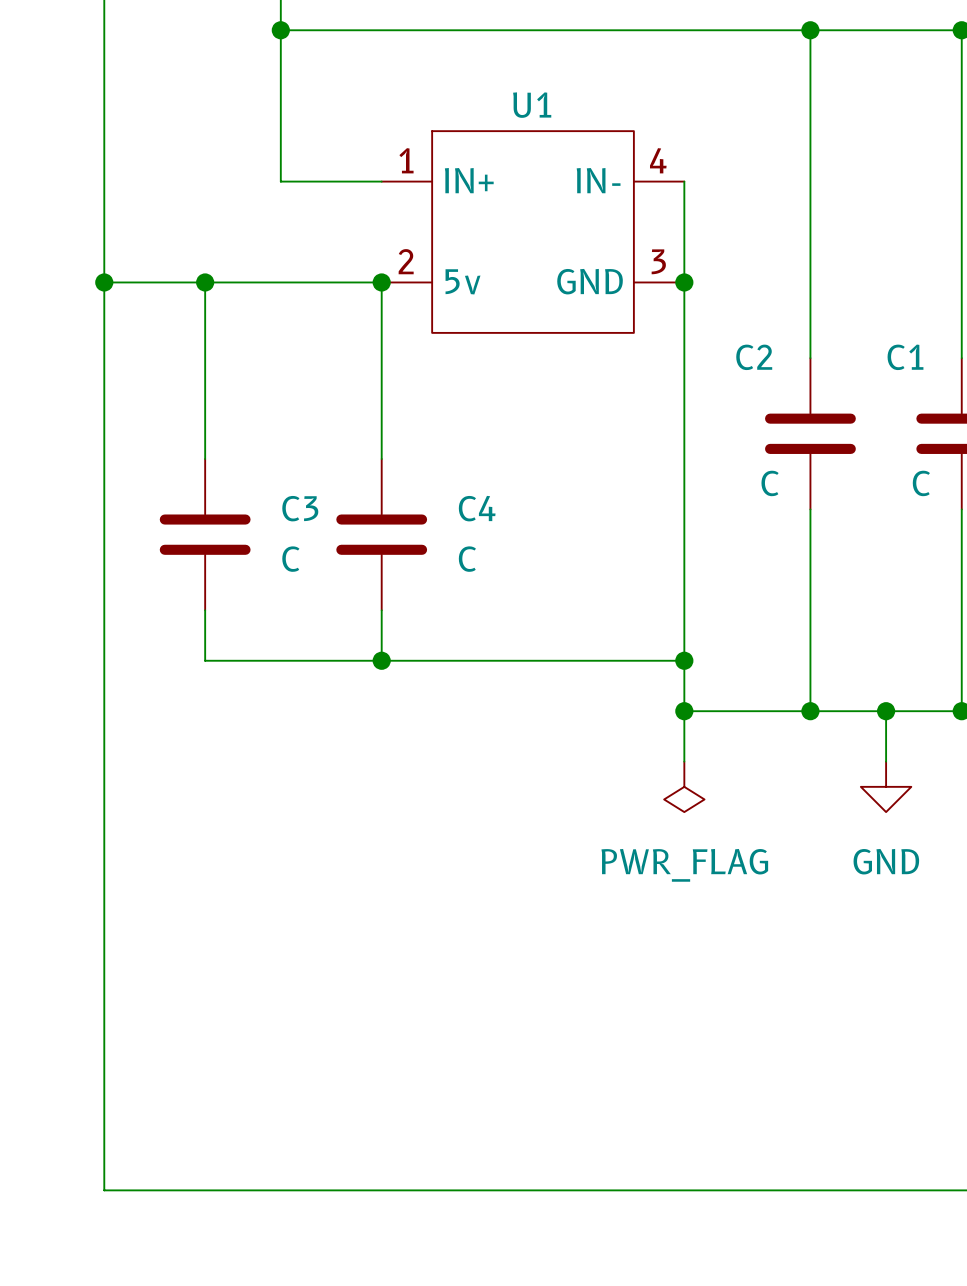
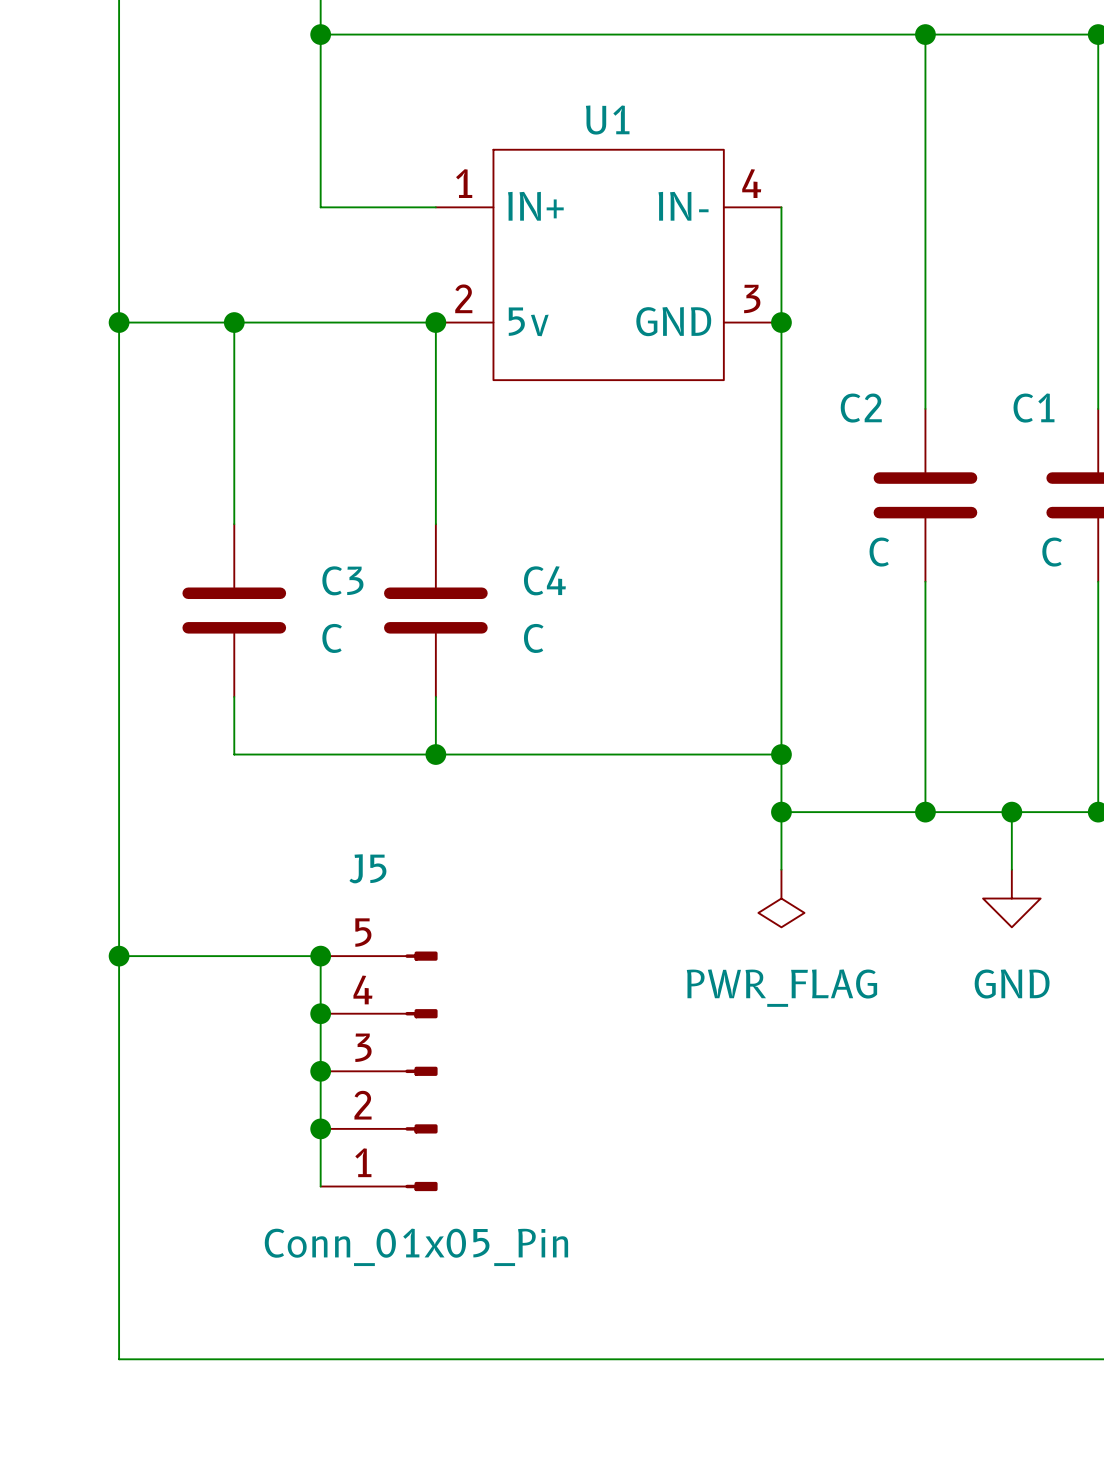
wire: none -> (119, 956) (320, 956) (320, 1186)
junction: none -> (119, 956)
junction: none -> (320, 956)
junction: none -> (320, 1013)
junction: none -> (320, 1071)
J5: none -> Conn_01x05_Pin (379, 1071)
junction: none -> (320, 1128)

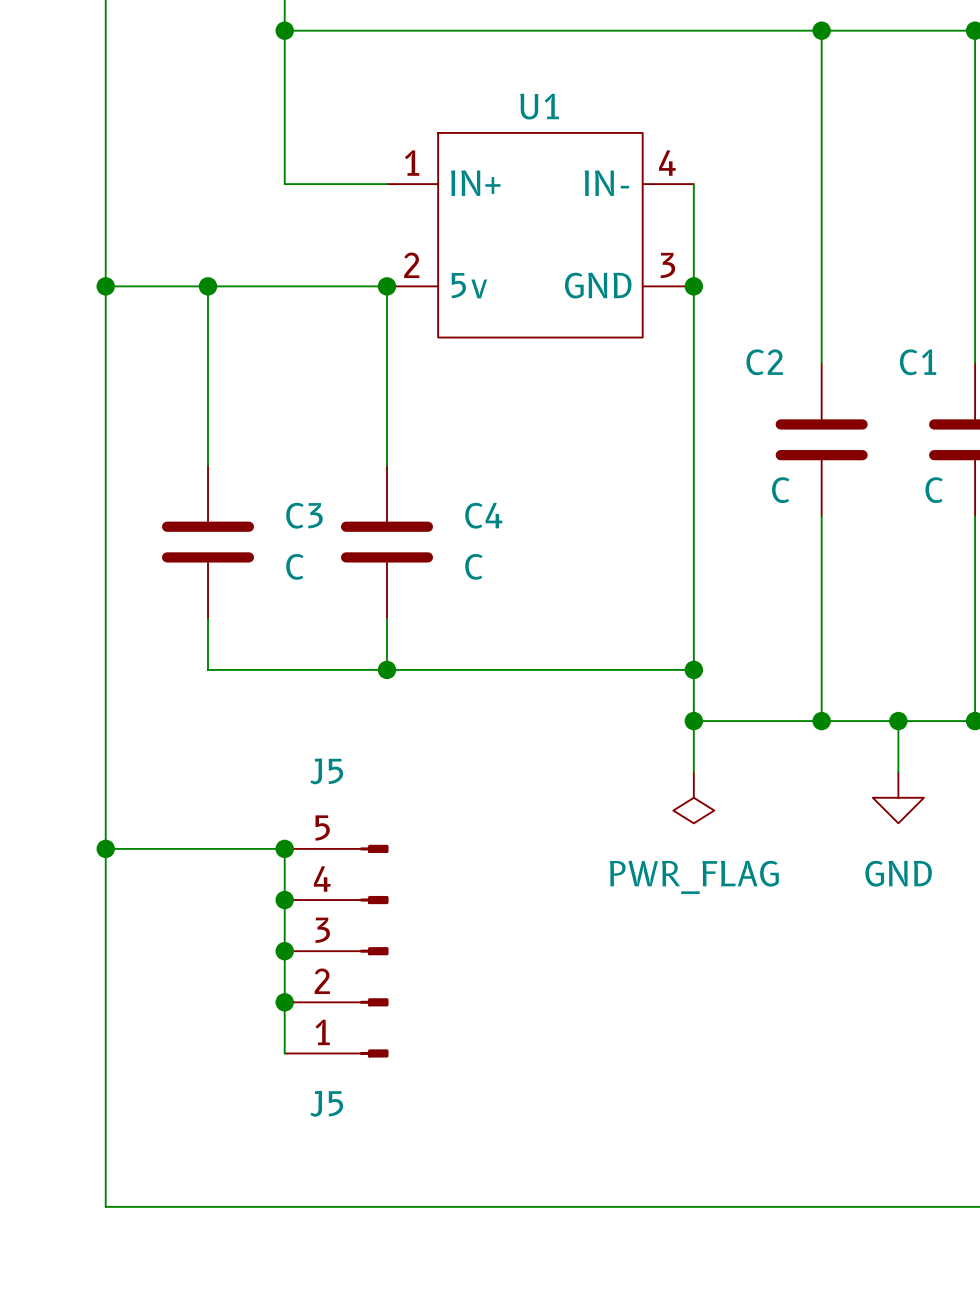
J5 value: Conn_01x05_Pin (416, 1247) -> J5 (326, 1103)

